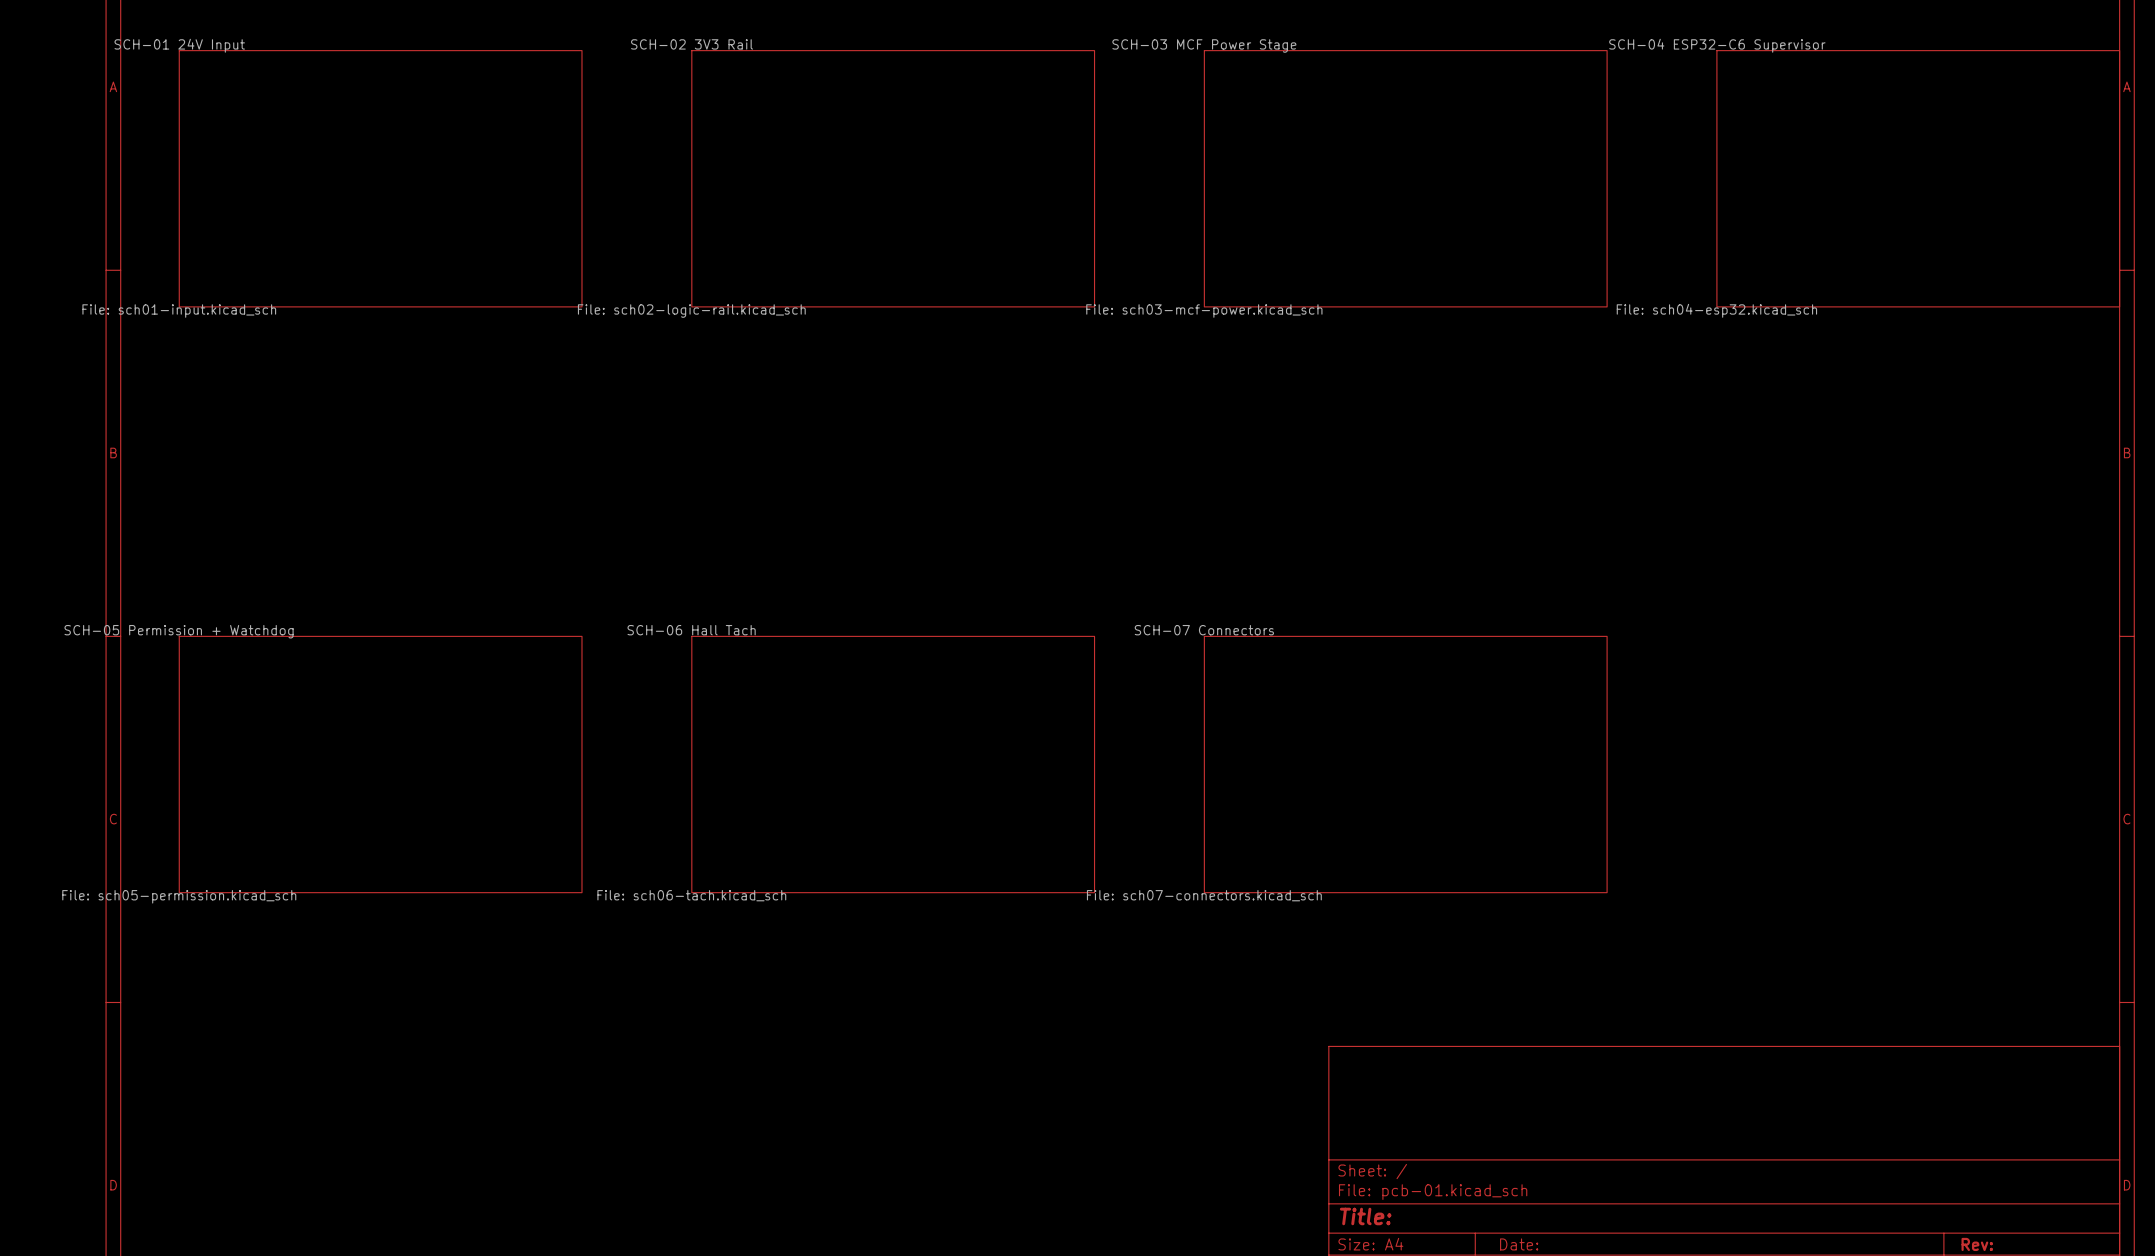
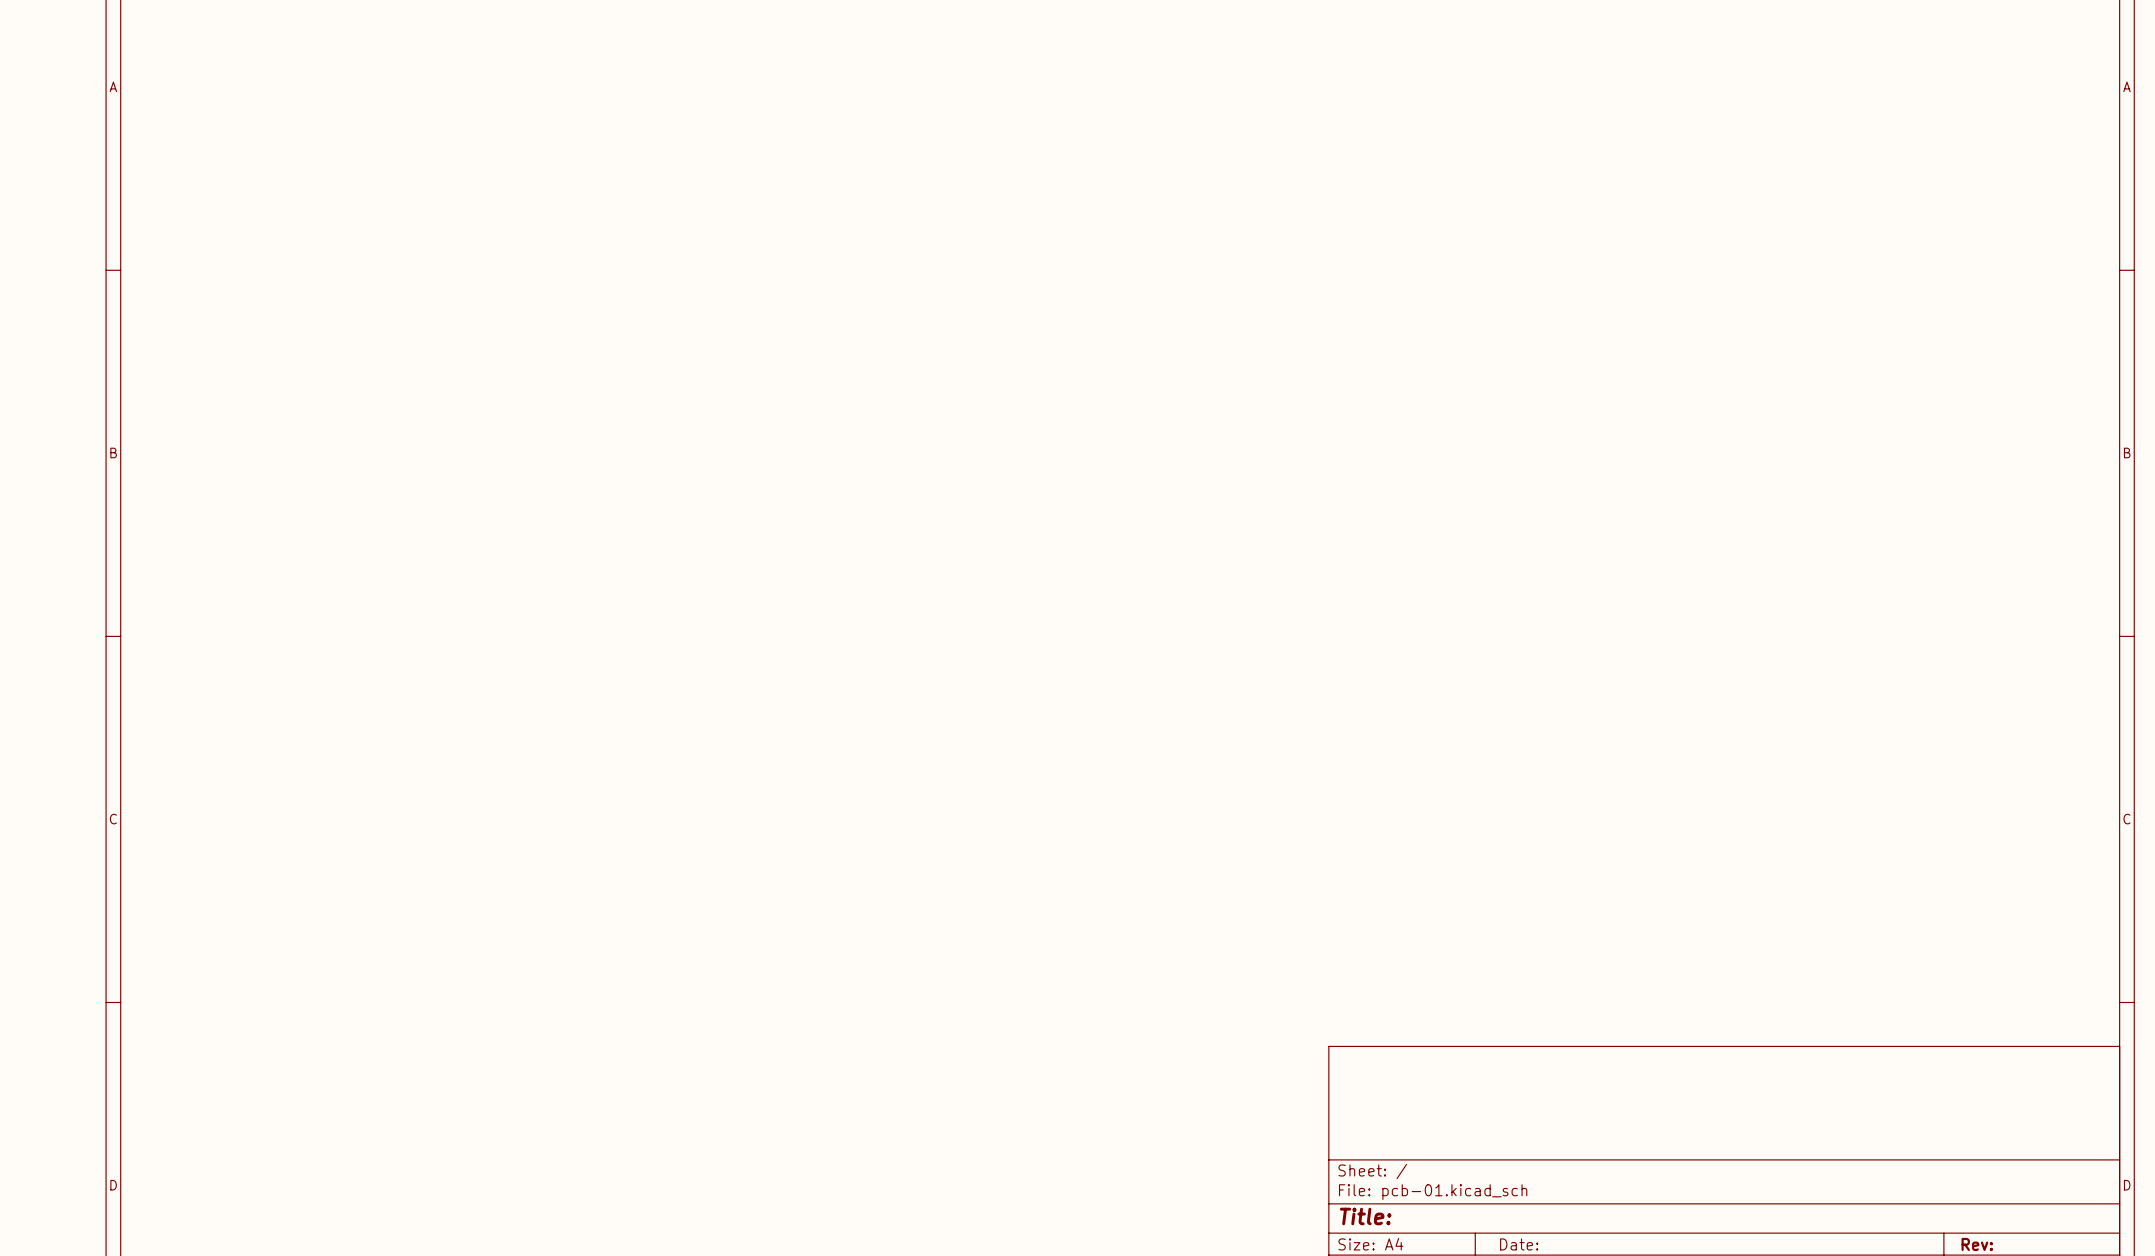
sheet SCH-01 24V Input: File: sch01-input.kicad_sch (380, 178) -> none
sheet SCH-02 3V3 Rail: File: sch02-logic-rail.kicad_sch (893, 178) -> none
sheet SCH-03 MCF Power Stage: File: sch03-mcf-power.kicad_sch (1405, 178) -> none
sheet SCH-04 ESP32-C6 Supervisor: File: sch04-esp32.kicad_sch (1918, 178) -> none
sheet SCH-05 Permission + Watchdog: File: sch05-permission.kicad_sch (380, 764) -> none
sheet SCH-06 Hall Tach: File: sch06-tach.kicad_sch (893, 764) -> none
sheet SCH-07 Connectors: File: sch07-connectors.kicad_sch (1405, 764) -> none

